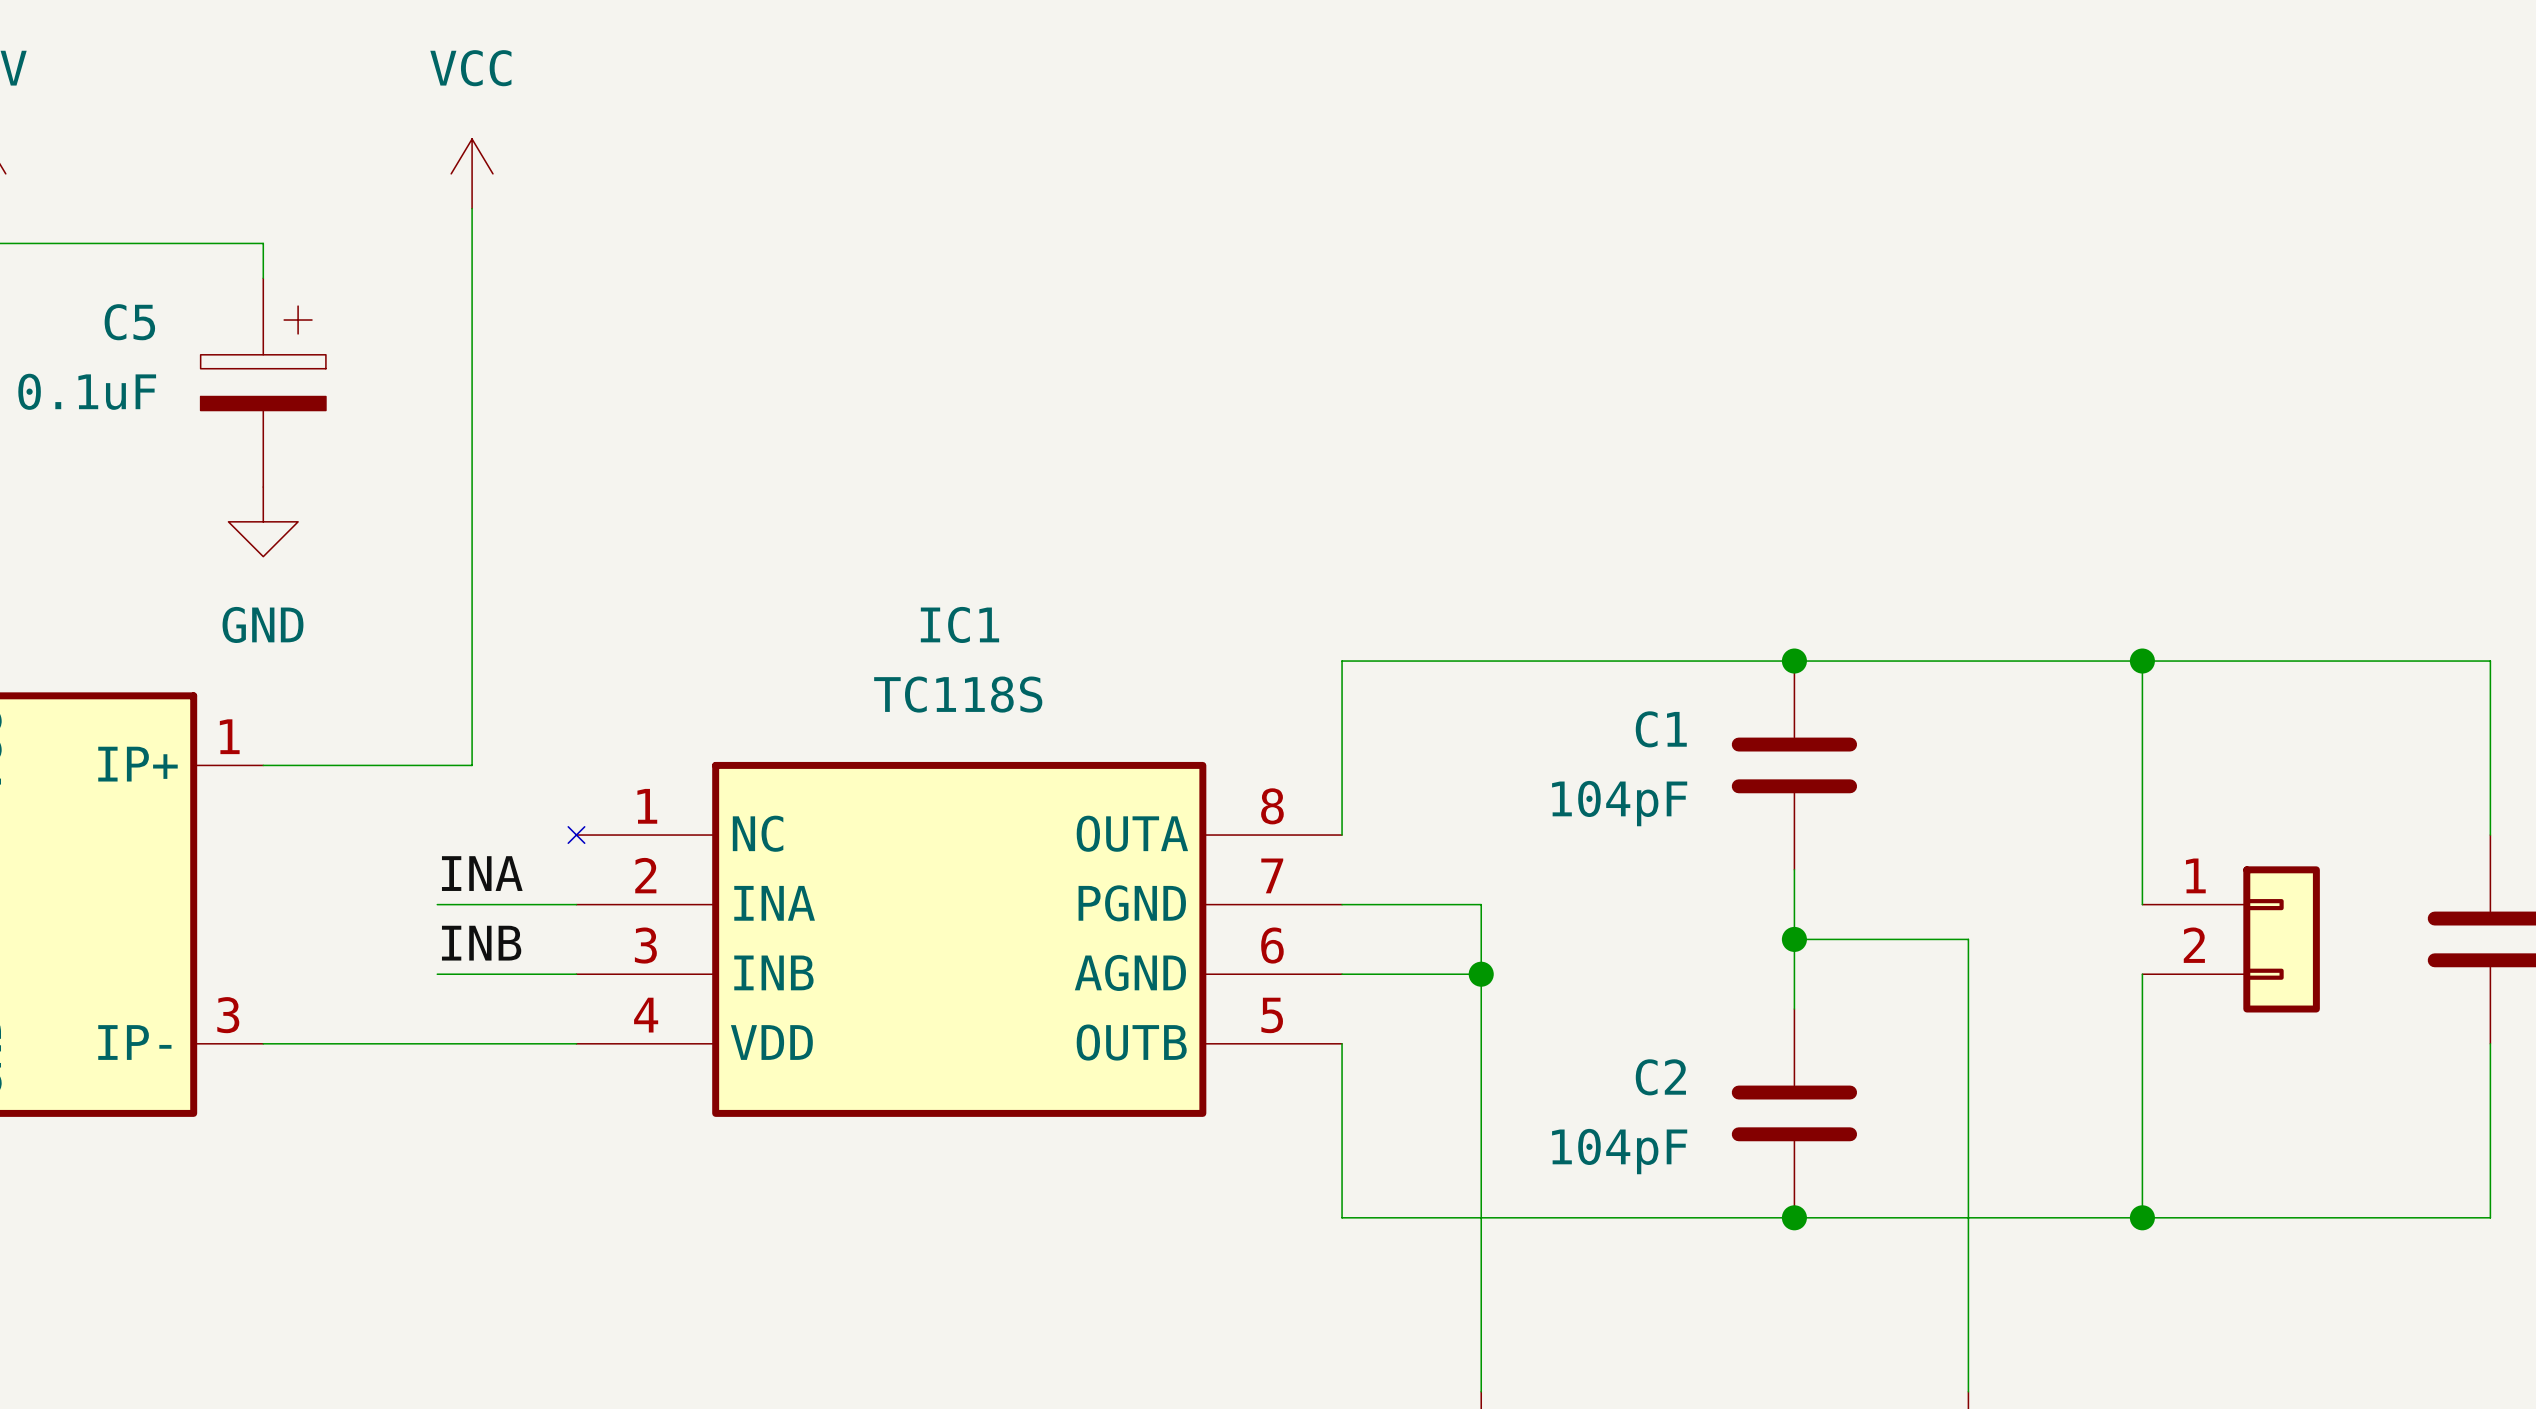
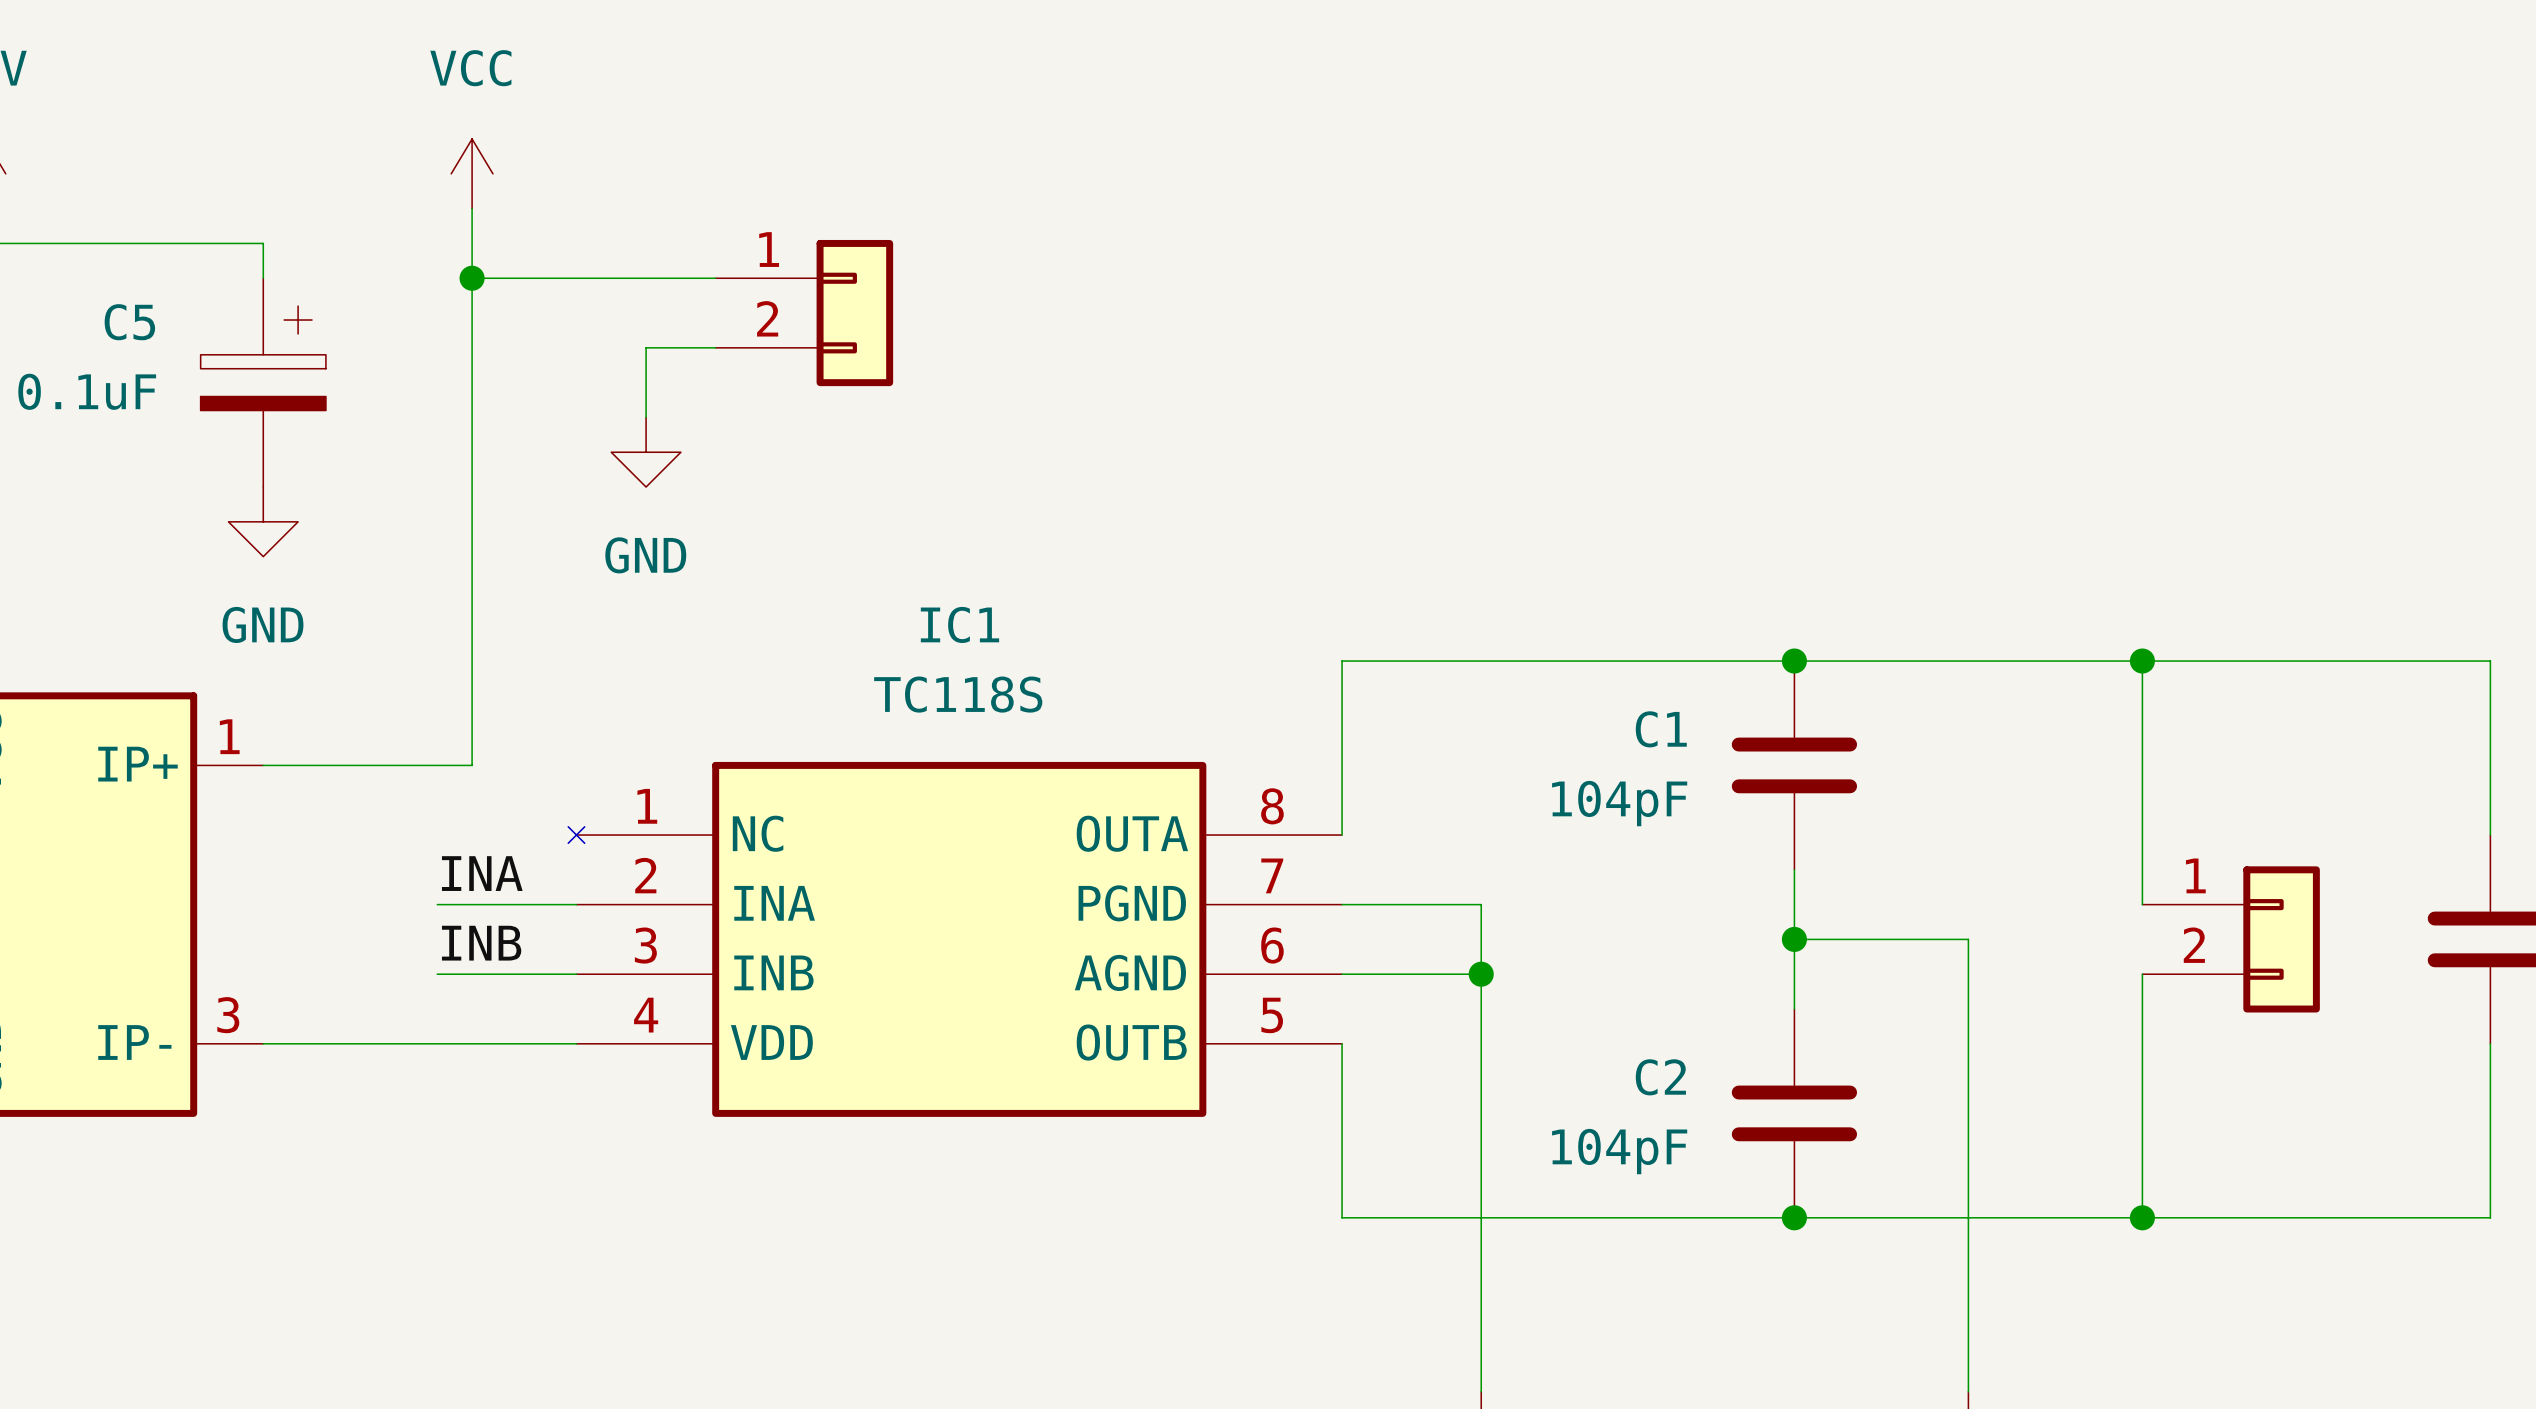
wire: none -> (472, 278) (715, 278)
junction: none -> (472, 278)
part: none -> (804, 313)
wire: none -> (715, 347) (646, 347) (646, 417)
power symbol: none -> GND (646, 452)

